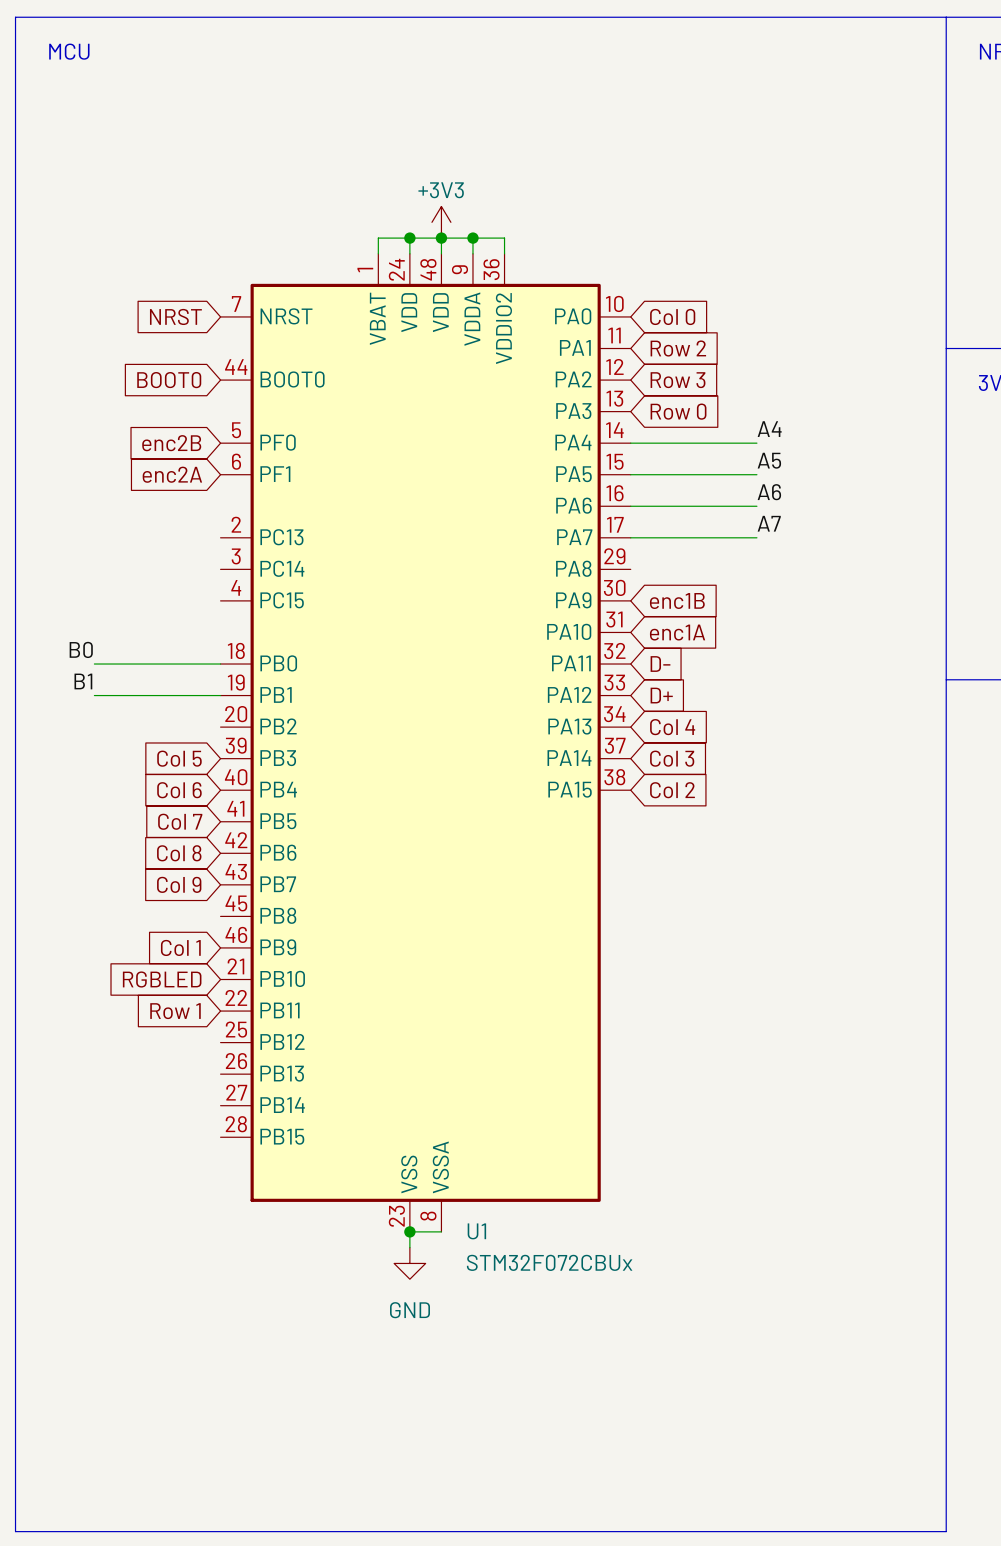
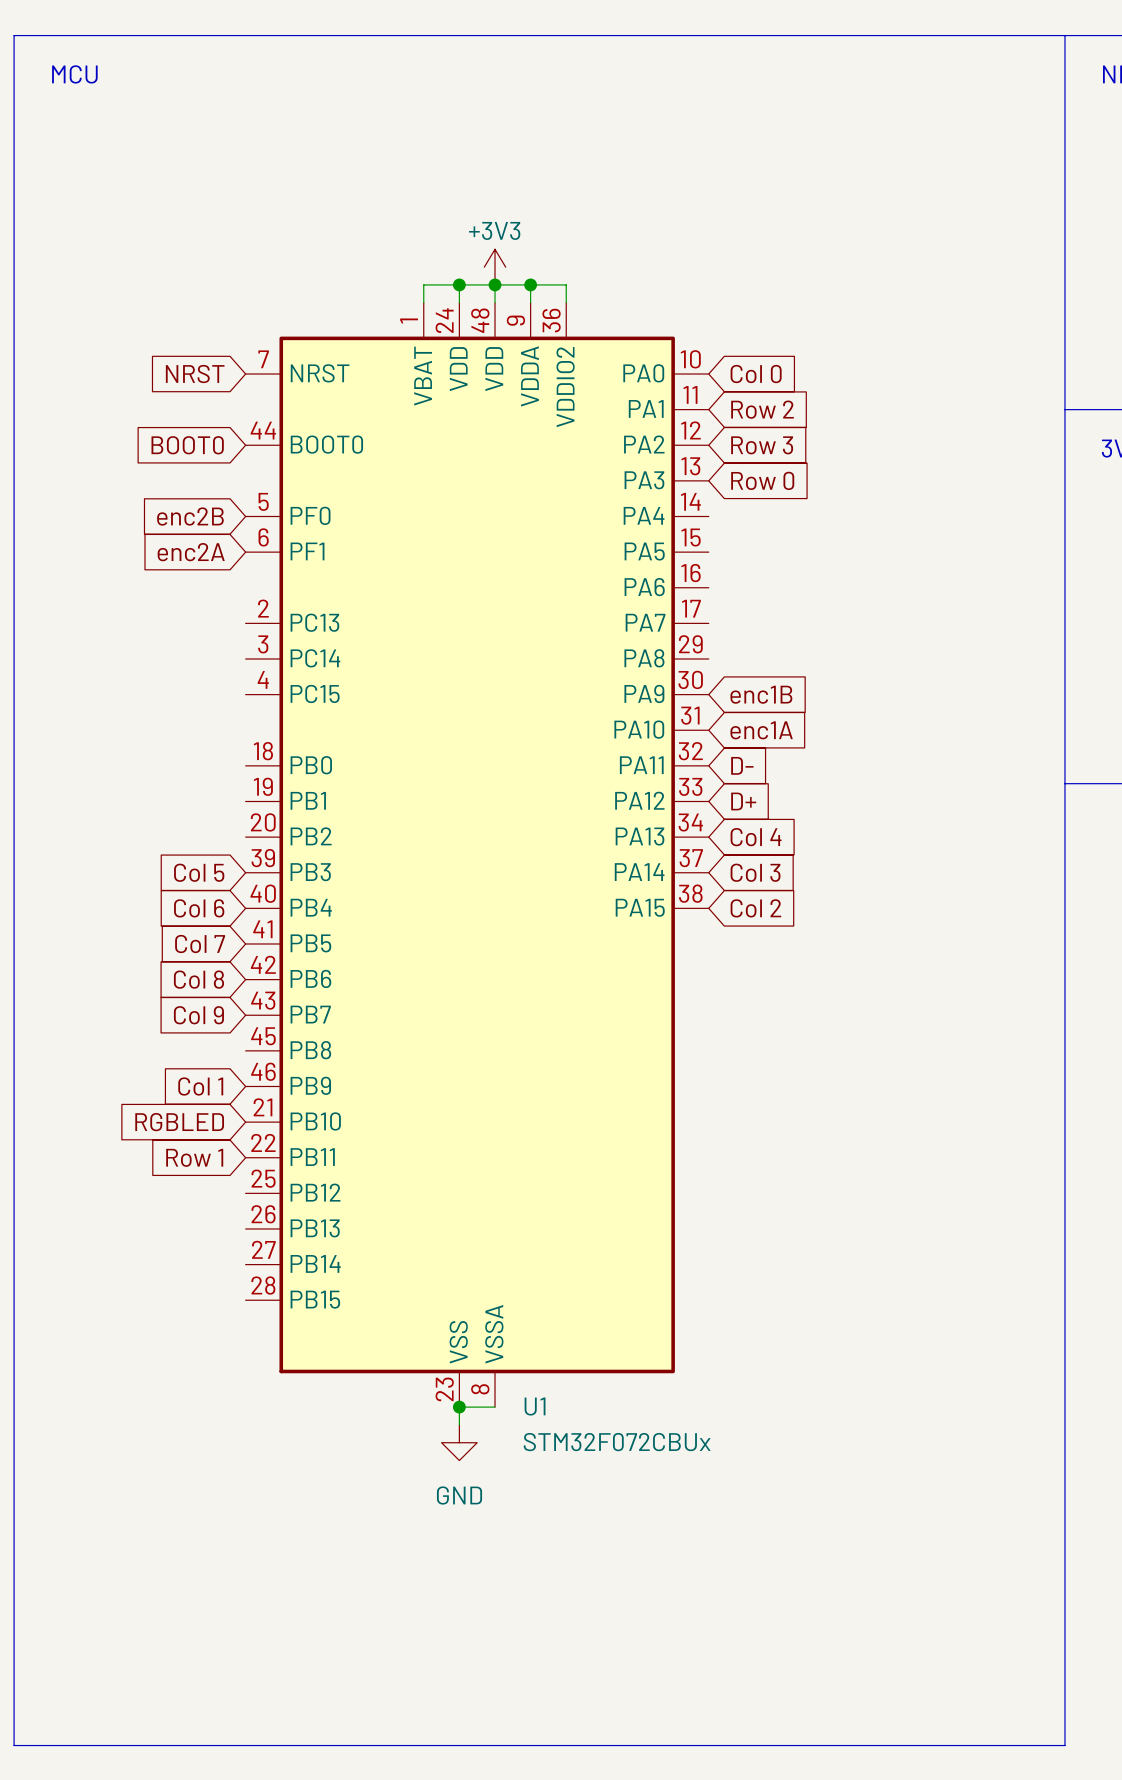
label: A4 (769, 429) -> none
wire: (630, 443) (756, 443) -> none
label: A5 (769, 460) -> none
wire: (630, 474) (756, 474) -> none
label: A6 (769, 492) -> none
wire: (630, 506) (756, 506) -> none
label: A7 (769, 523) -> none
wire: (630, 537) (756, 537) -> none
label: B0 (81, 649) -> none
wire: (94, 664) (220, 664) -> none
label: B1 (83, 681) -> none
wire: (94, 695) (220, 695) -> none

